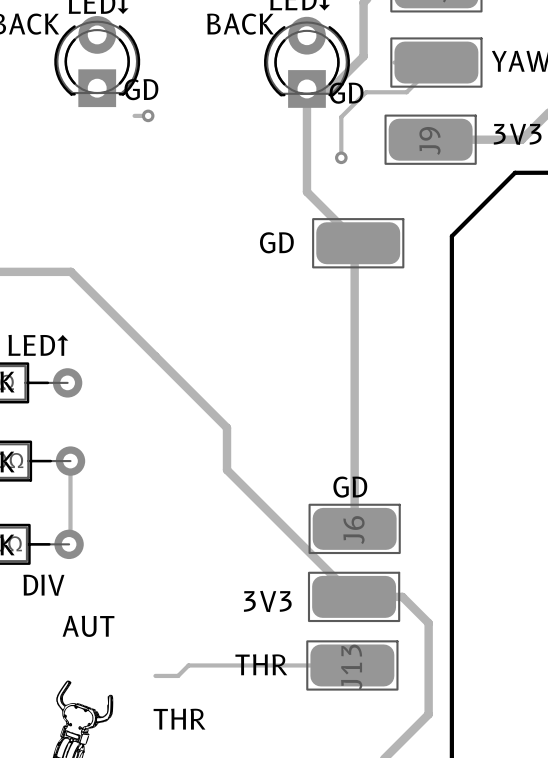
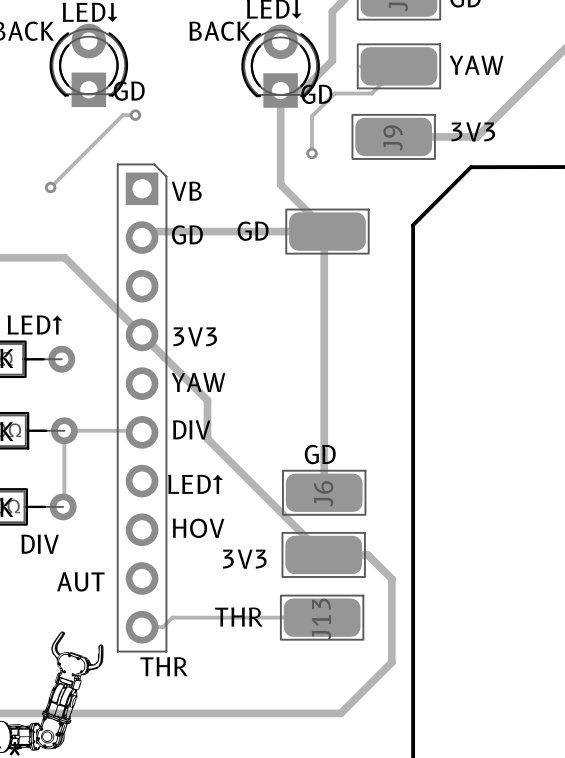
track: none -> (122, 115) (50, 187)
via: none -> (50, 187)
text: none -> VB (186, 191)
track: none -> (327, 231) (148, 231) (142, 237)
text: none -> GD (187, 234)
text: none -> 3V3 (195, 336)
text: none -> YAW (198, 382)
part: none -> (142, 408)
text: none -> DIV (191, 429)
track: none -> (64, 430) (140, 430) (142, 432)
text: none -> LED↑ (195, 484)
text: none -> HOV (198, 528)

